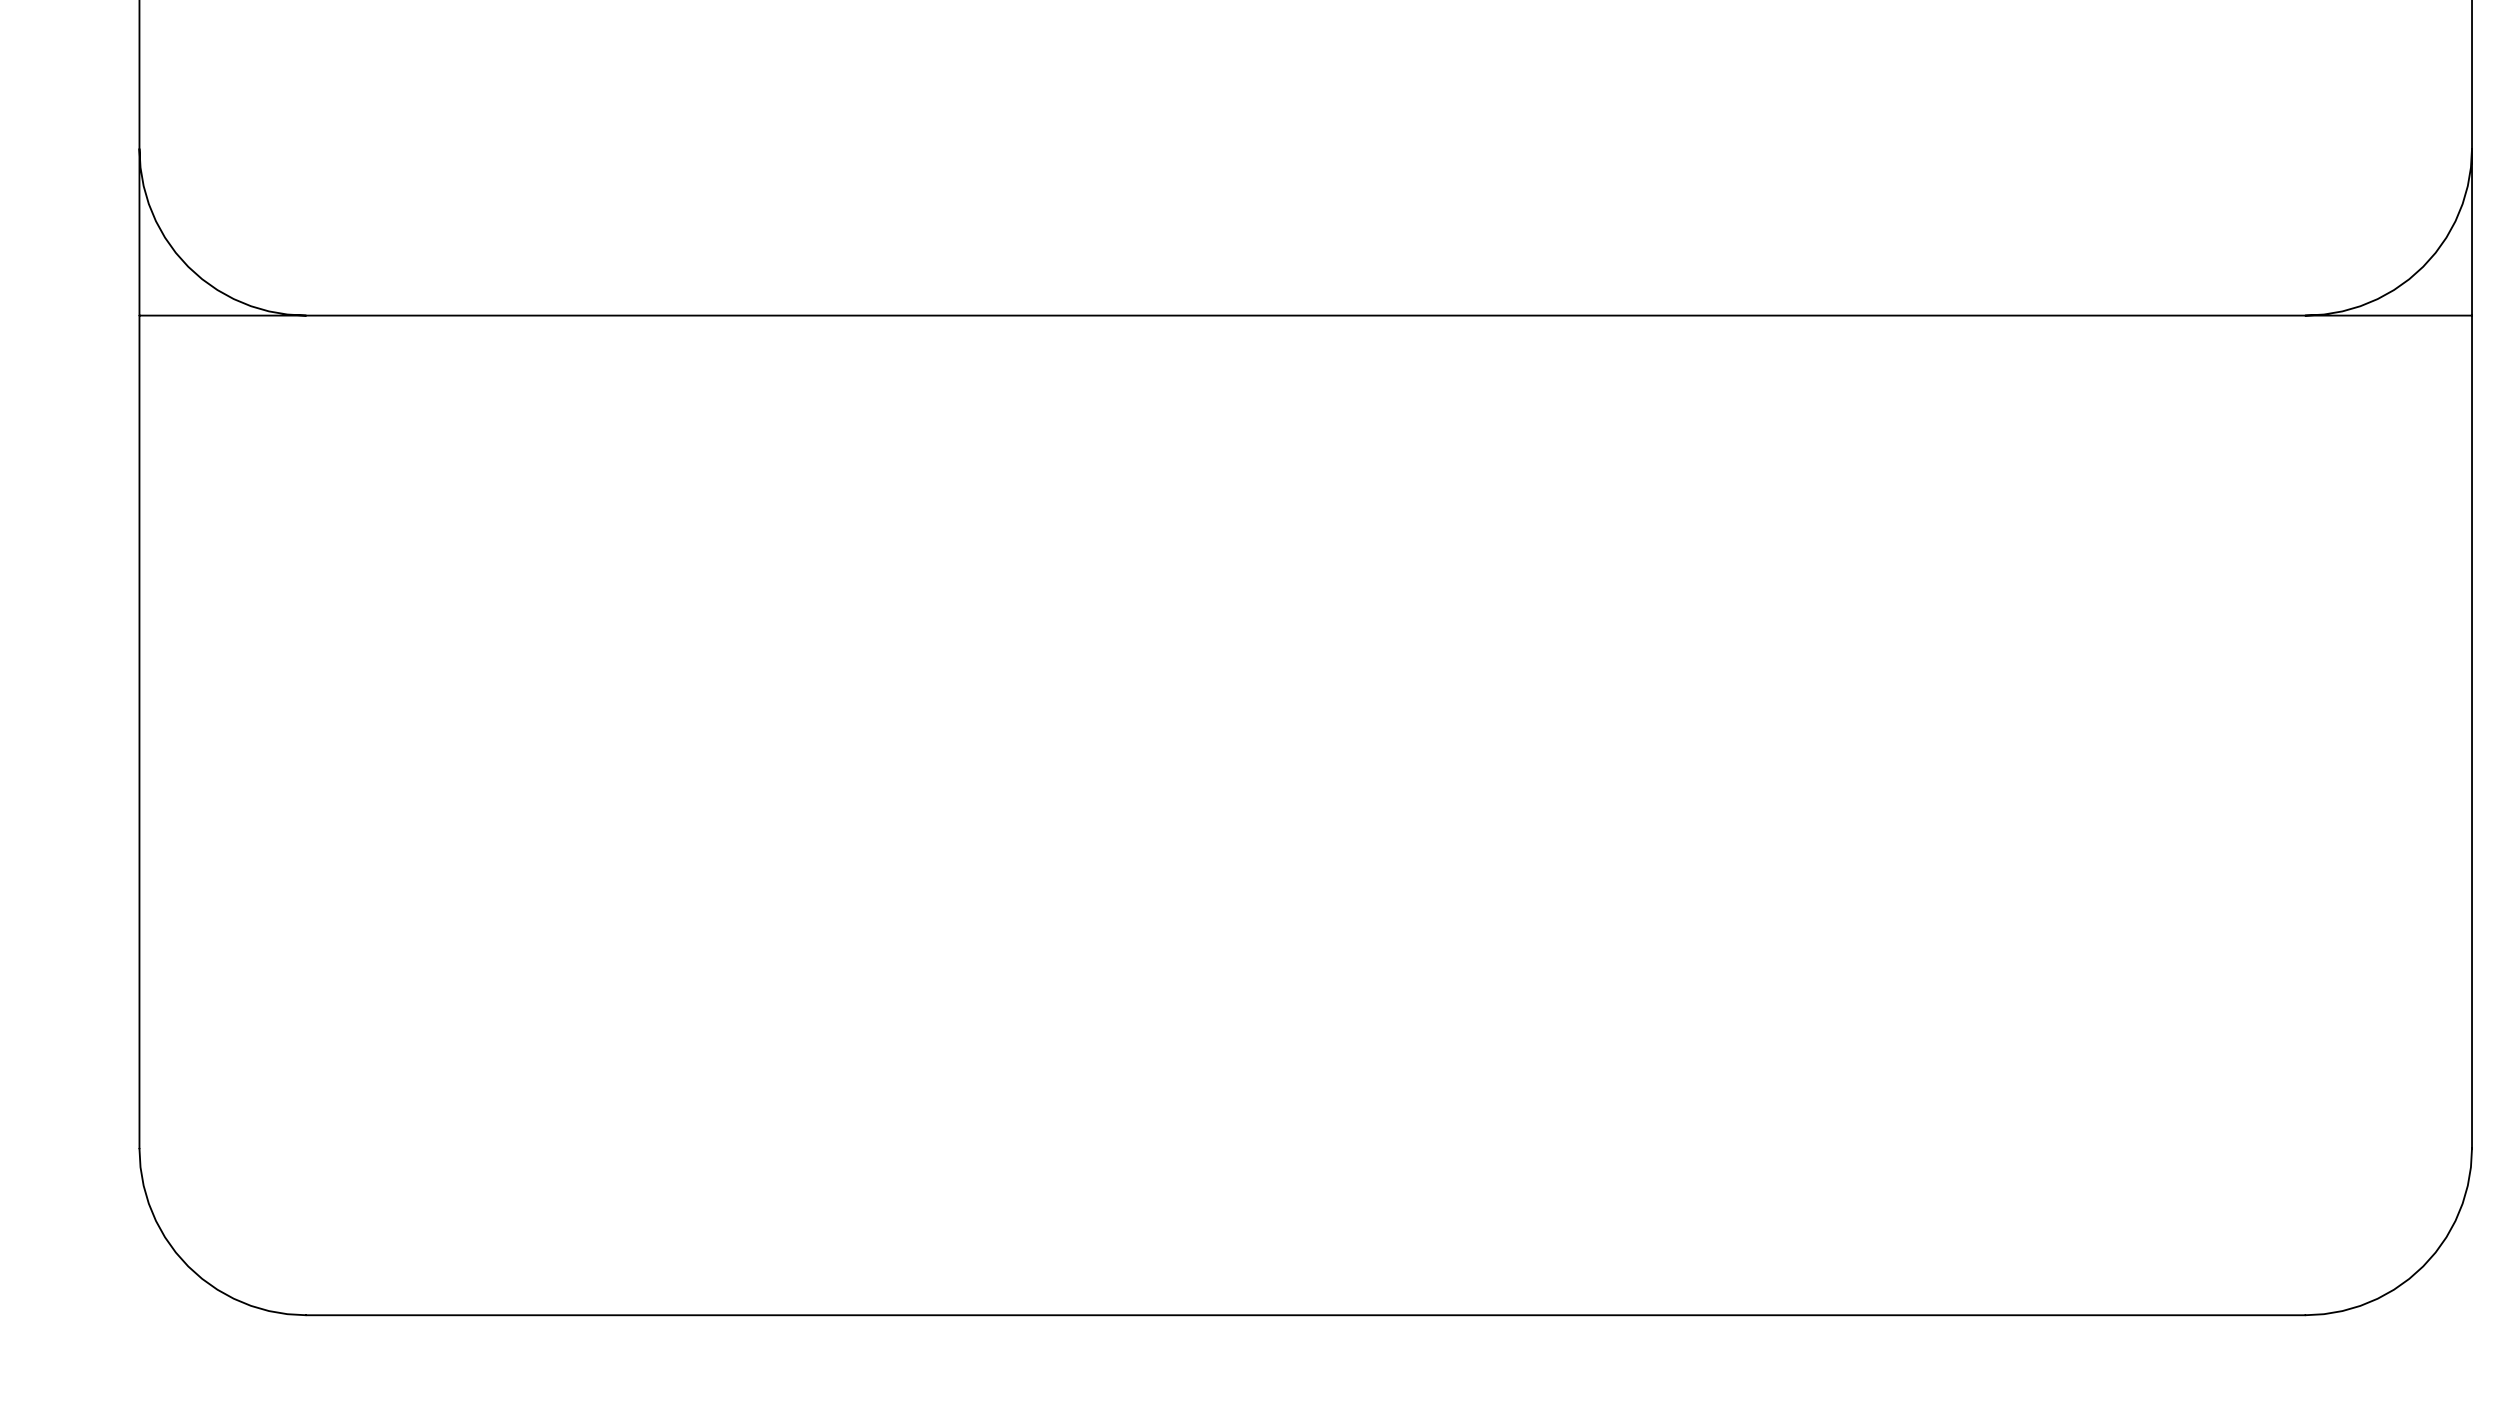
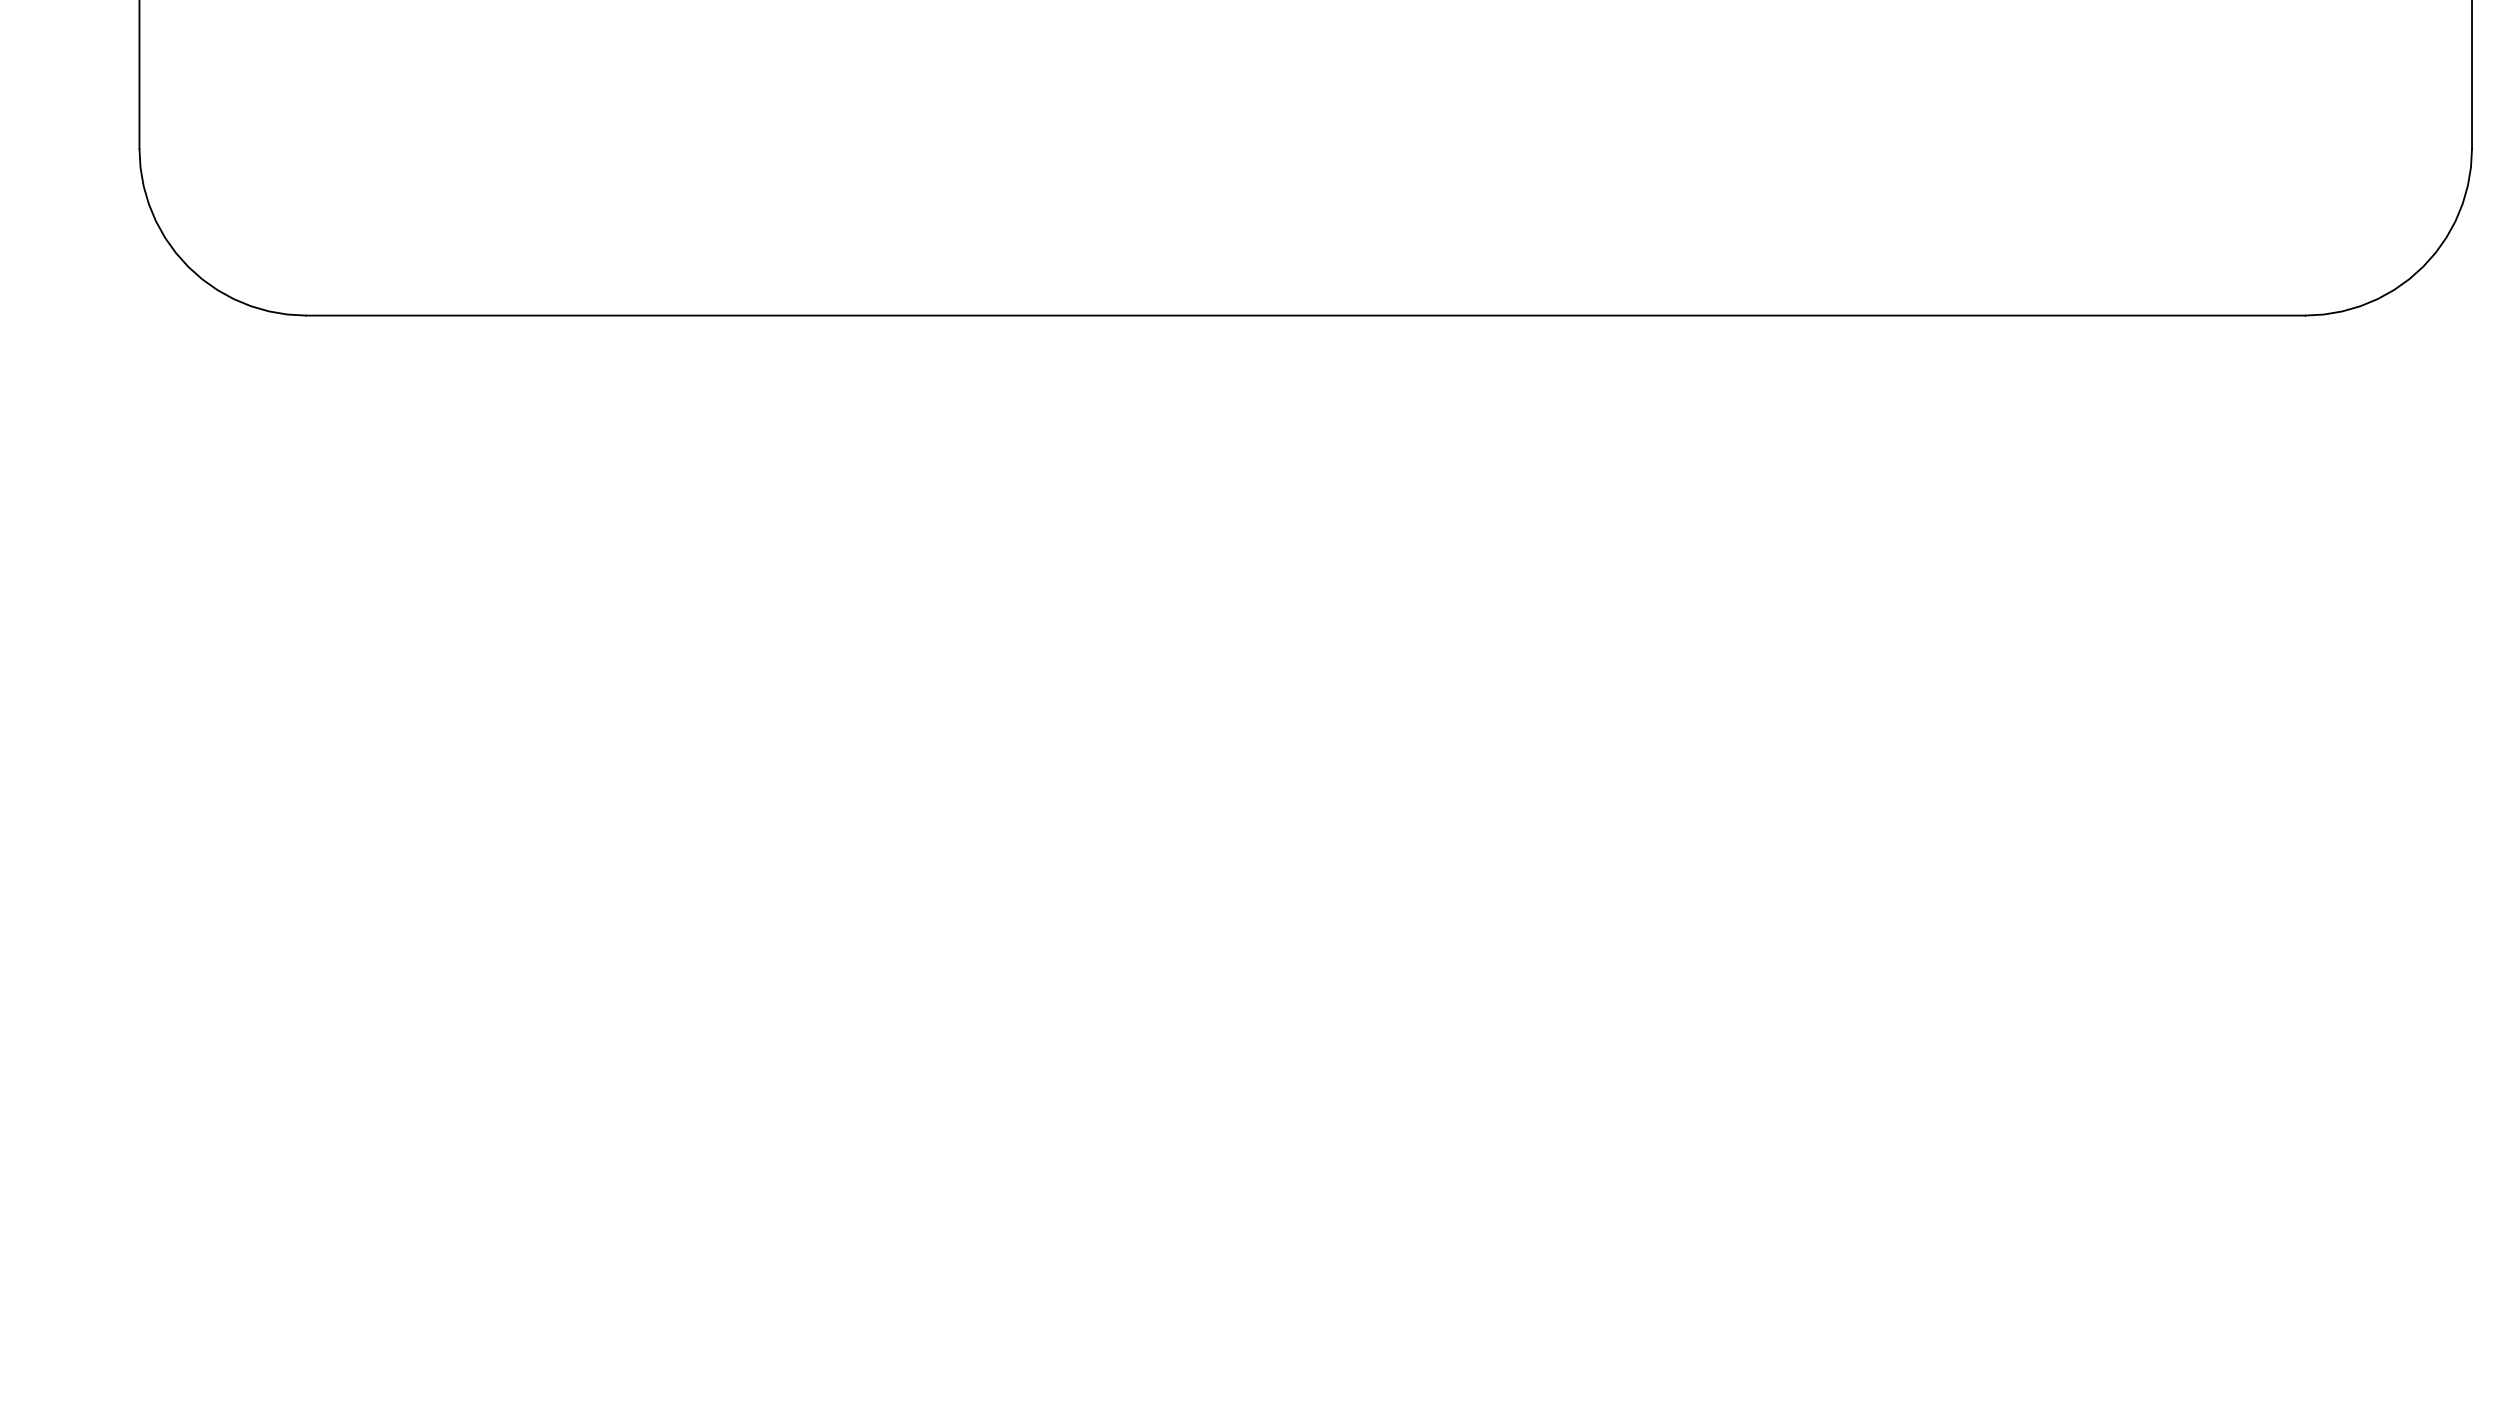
board edge: (2472, 148) (2470, 1167) (2462, 1203) (2455, 1220) (2446, 1237) (2423, 1266) (2394, 1289) (2360, 1305) (2324, 1314) (2305, 1315) (306, 1315) (269, 1311) (233, 1298) (217, 1289) (188, 1266) (165, 1237) (148, 1203) (140, 1167) (139, 148) -> none
board edge: (306, 315) (139, 315) -> none
board edge: (2472, 315) (2305, 315) -> none

